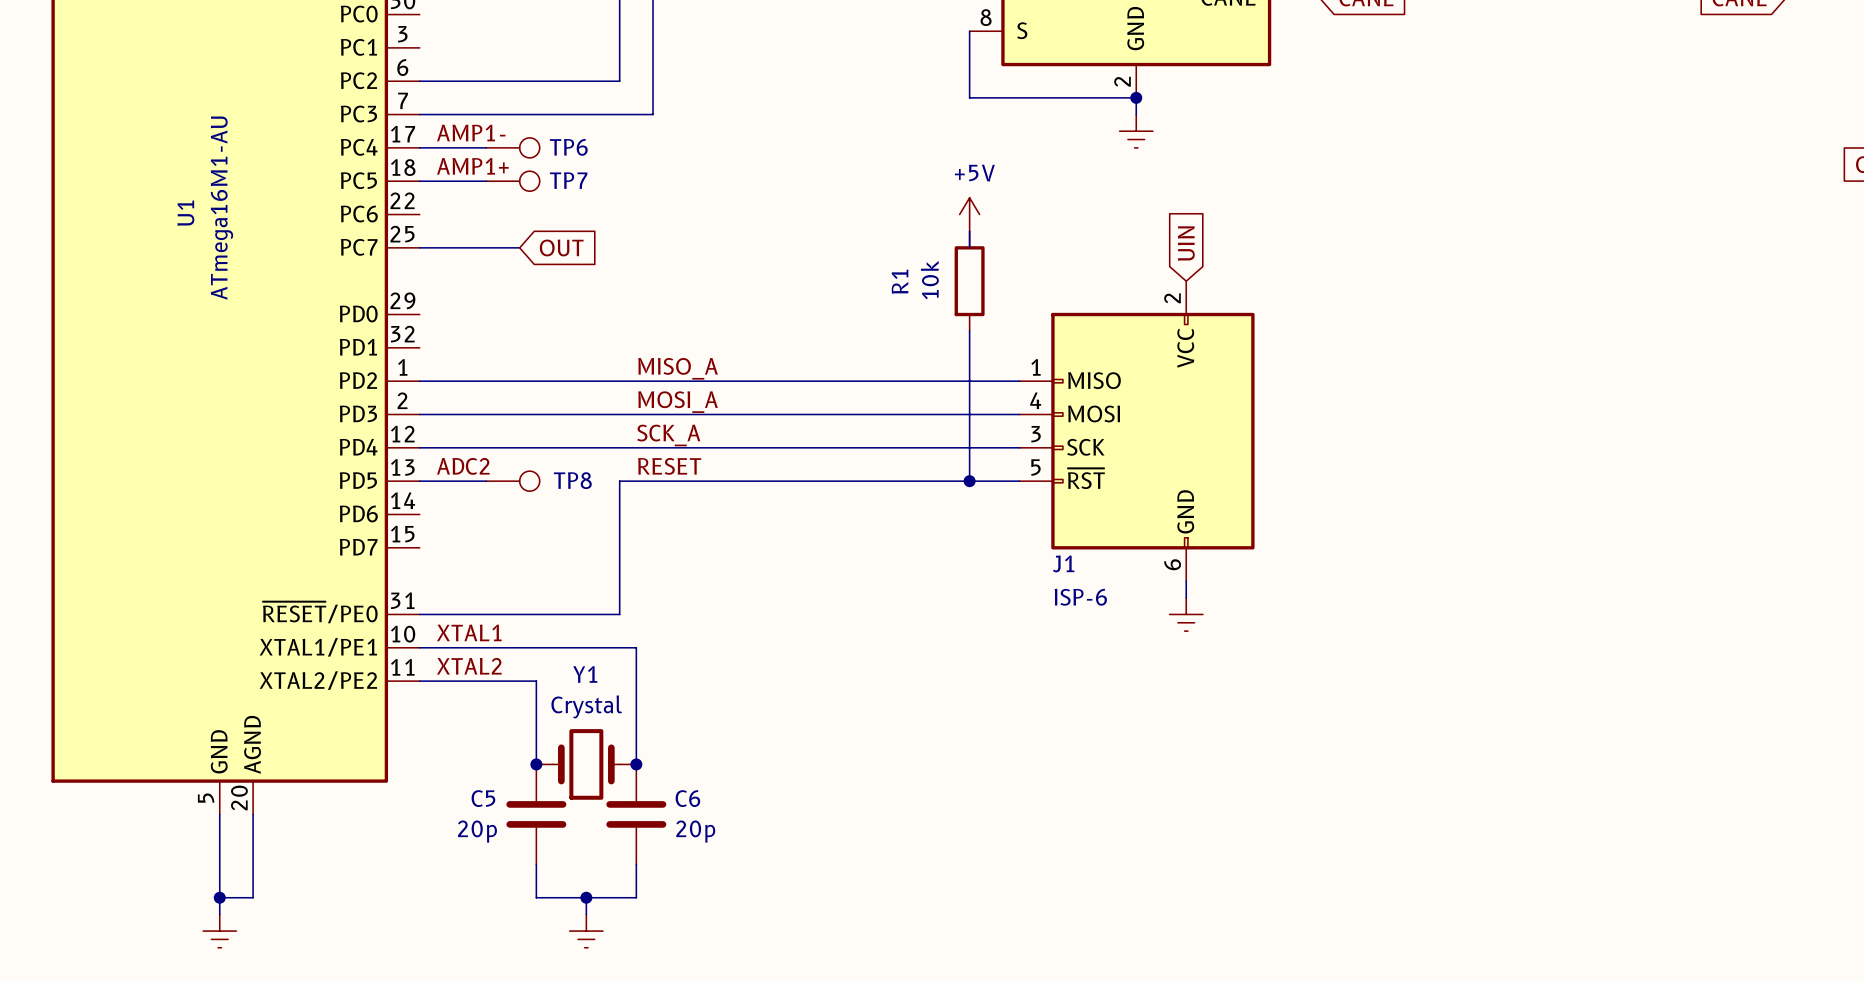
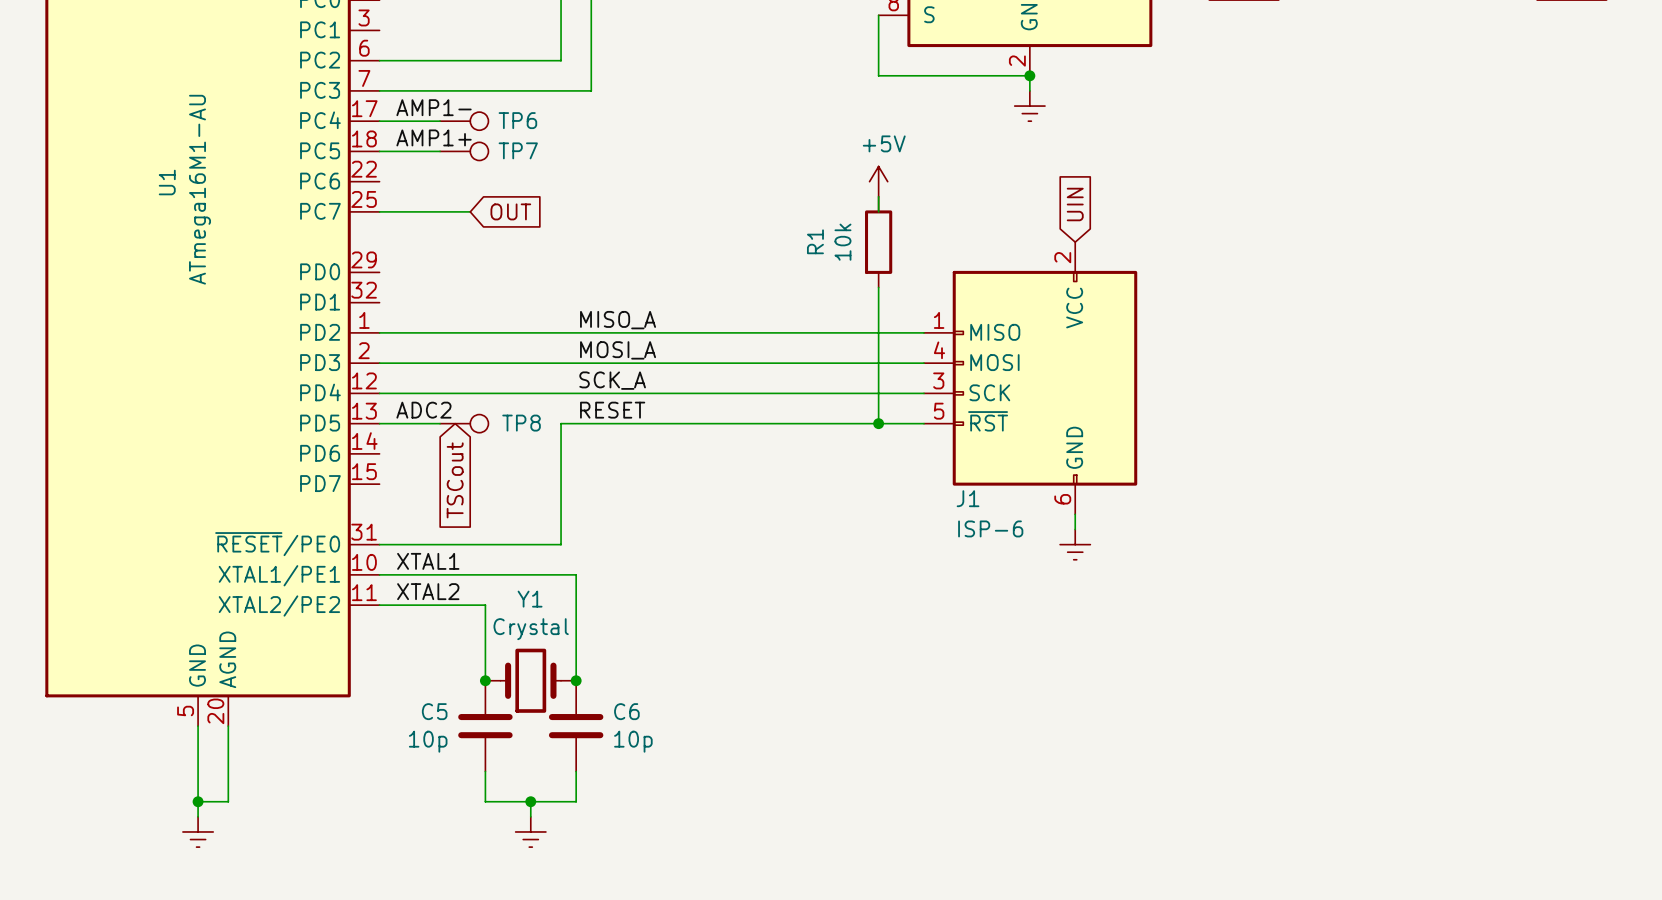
global label: none -> TSCout (455, 480)
C5 value: 20p (477, 831) -> 10p (428, 741)
C6 value: 20p (695, 831) -> 10p (633, 741)

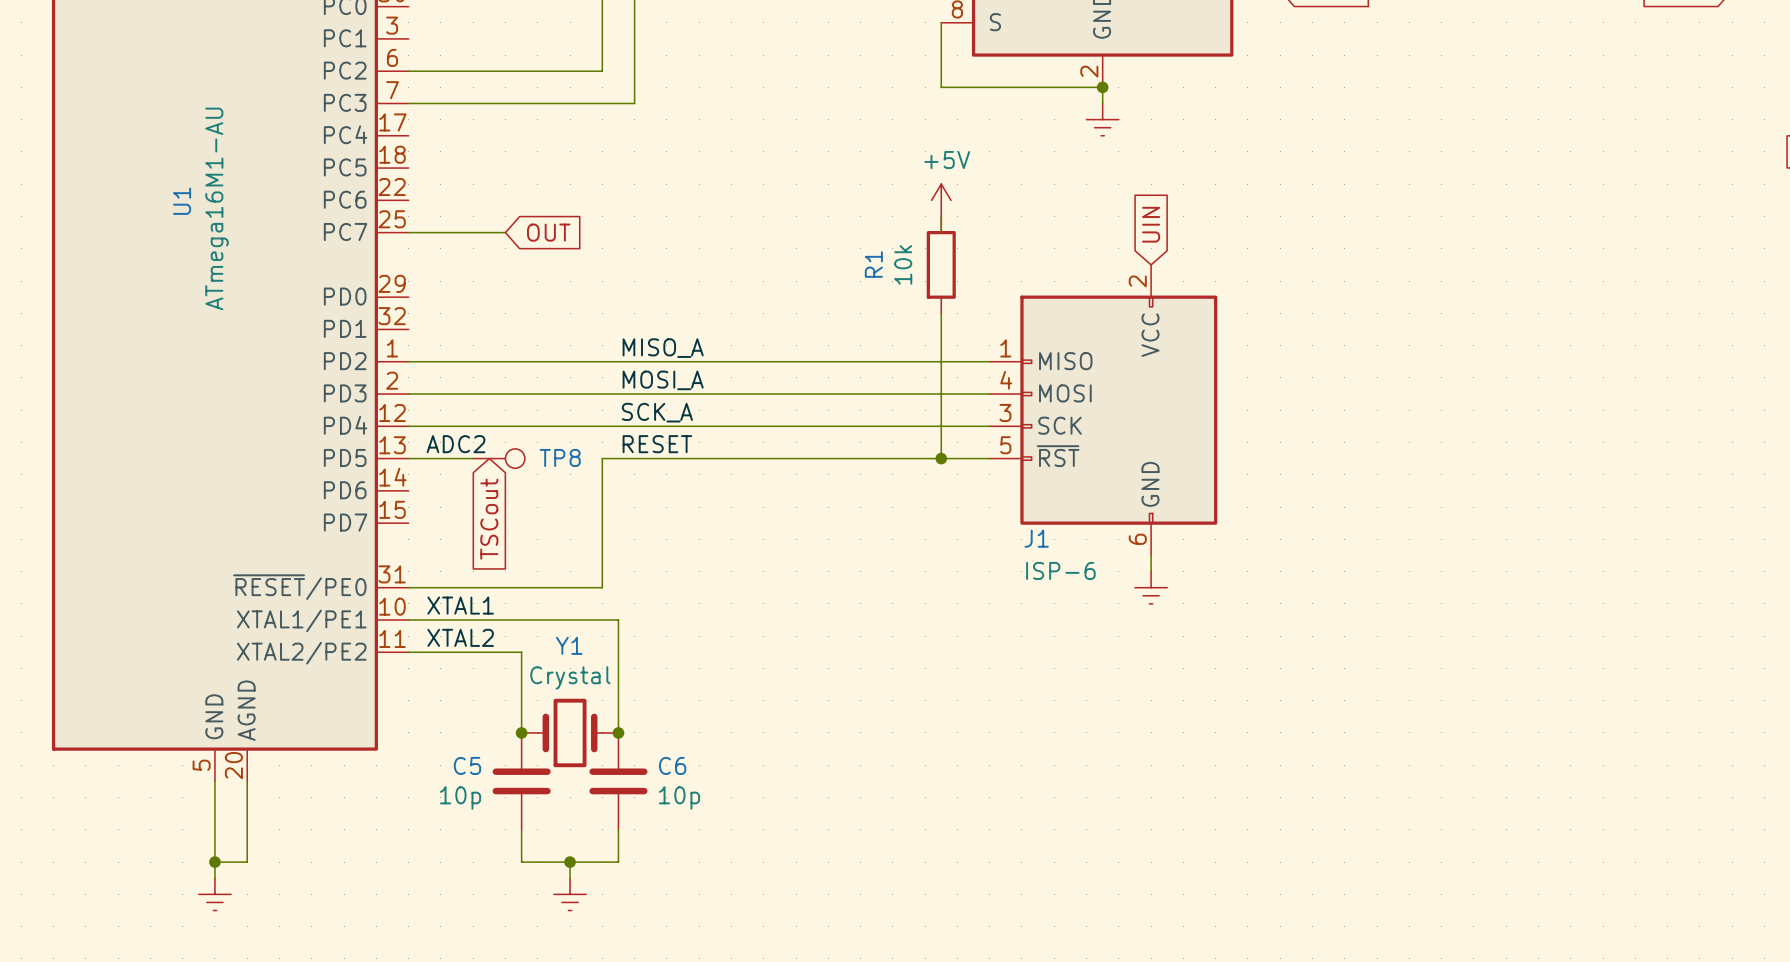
label: AMP1- (434, 107) -> none
wire: (379, 121) (440, 121) -> none
TP6: (464, 121) -> none
label: AMP1+ (434, 137) -> none
wire: (379, 151) (440, 151) -> none
TP7: (464, 151) -> none

